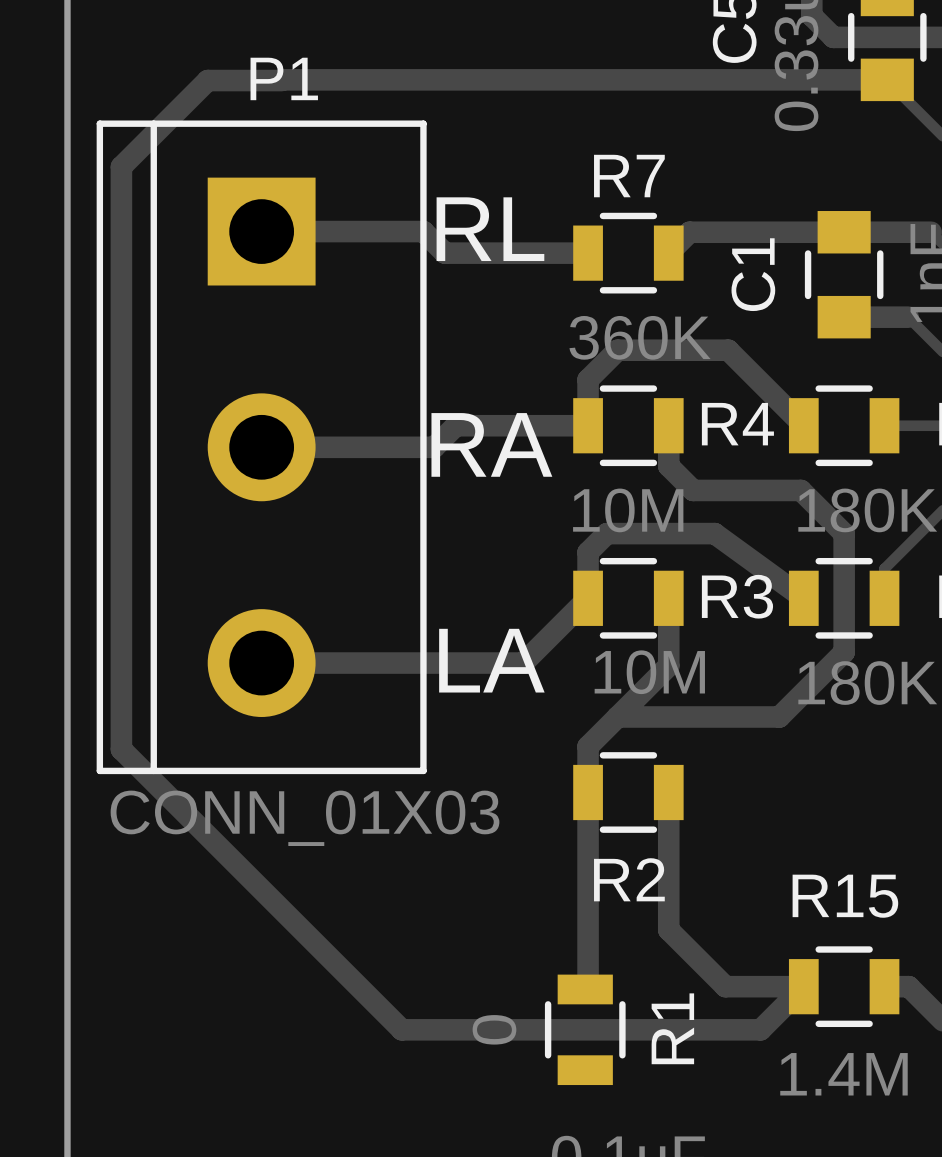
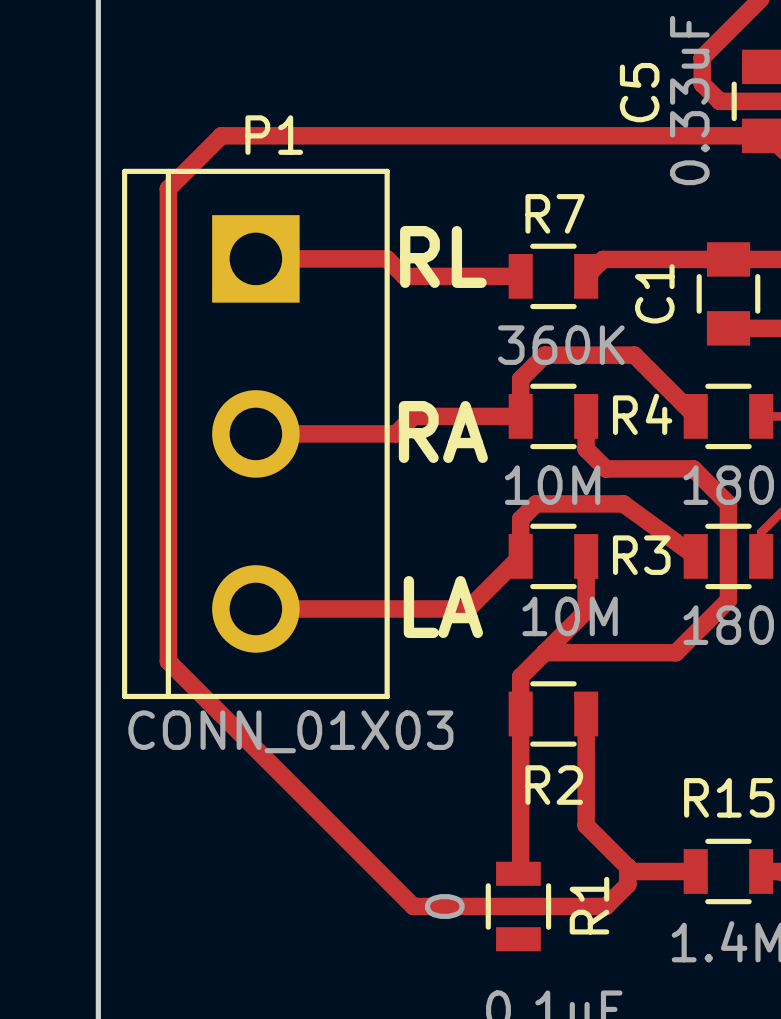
track: (282, 79) (207, 80) (121, 166) (121, 749) (401, 1029) (455, 1029) -> (272, 135) (221, 135) (168, 188) (168, 661) (413, 906)
track: (803, 986) (760, 1029) (693, 1029) -> (627, 867) (627, 884) (605, 906)

